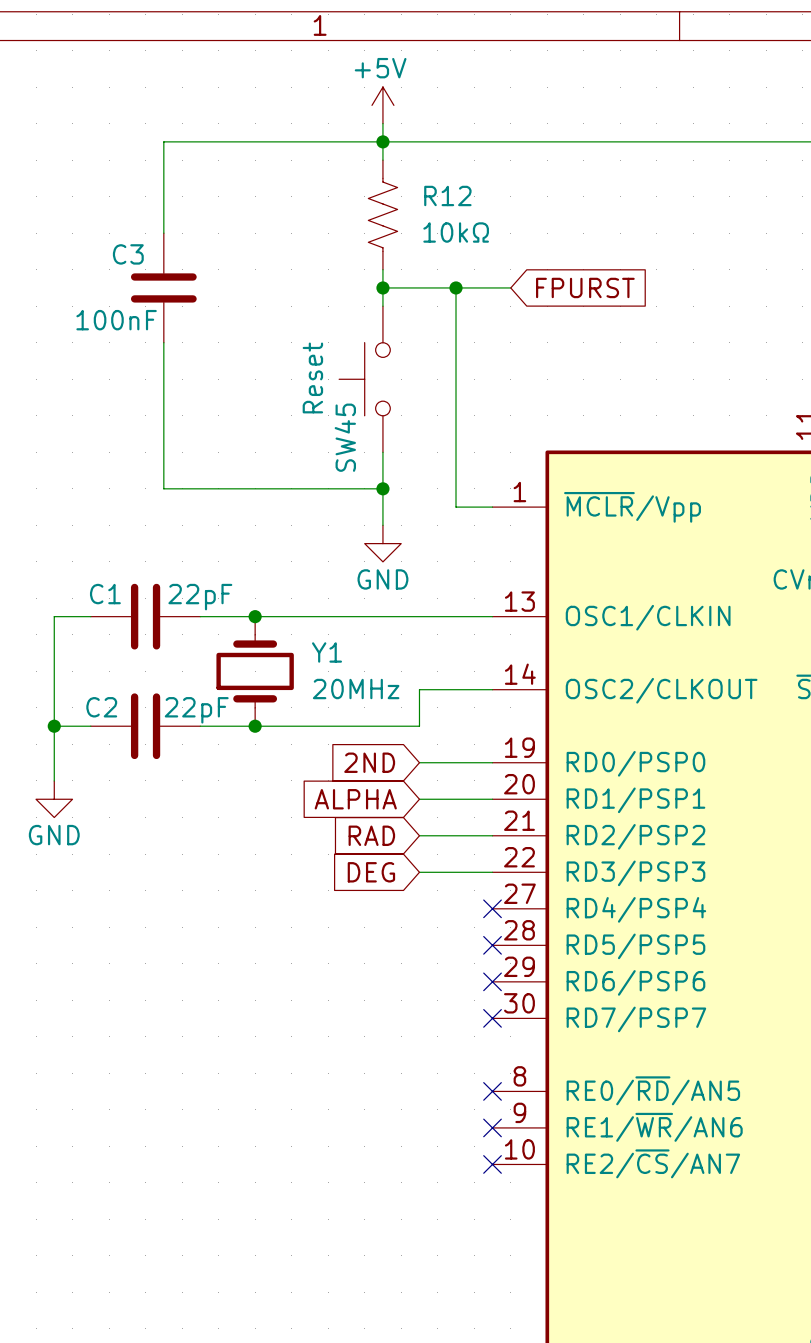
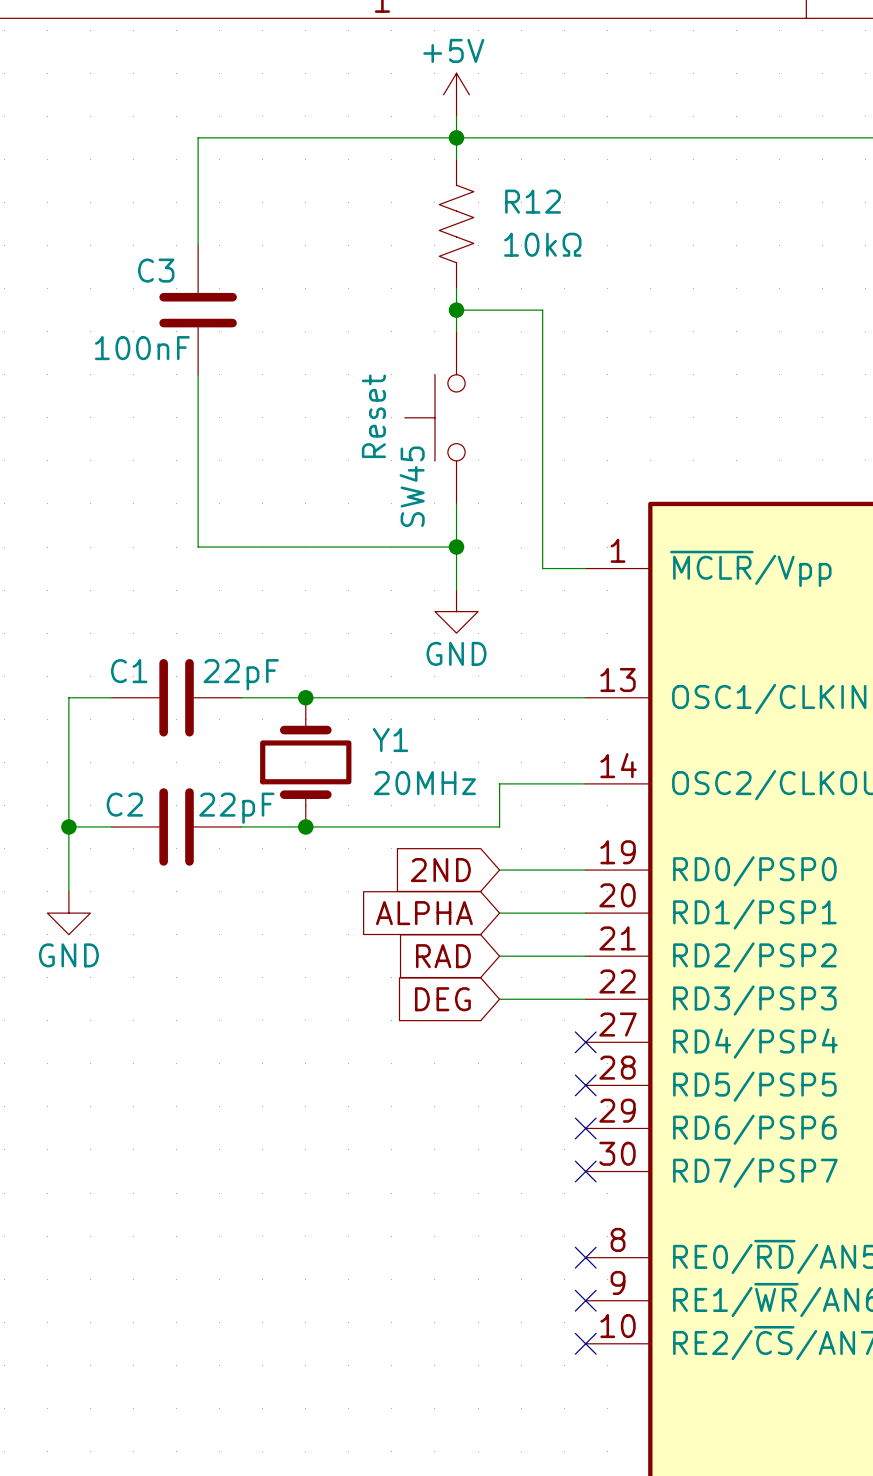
wire: (456, 287) (510, 287) -> none
junction: (456, 287) -> none
global label: FPURST (585, 287) -> none

